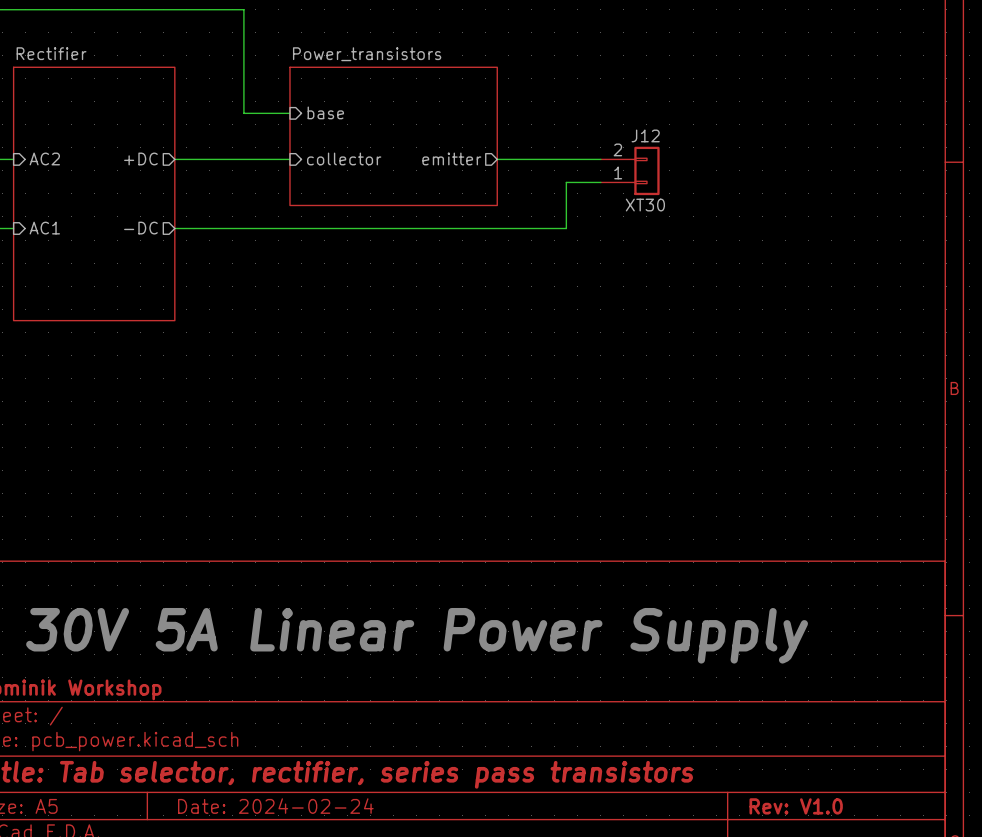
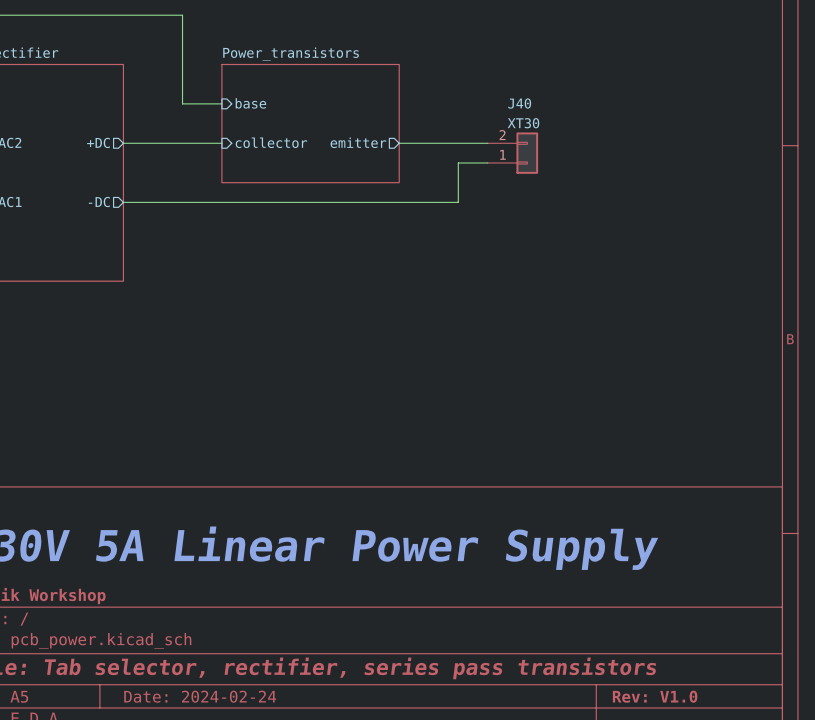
J12 name: J12 (645, 135) -> J40 (519, 103)
J12 value position: XT30 (645, 205) -> XT30 (523, 123)

